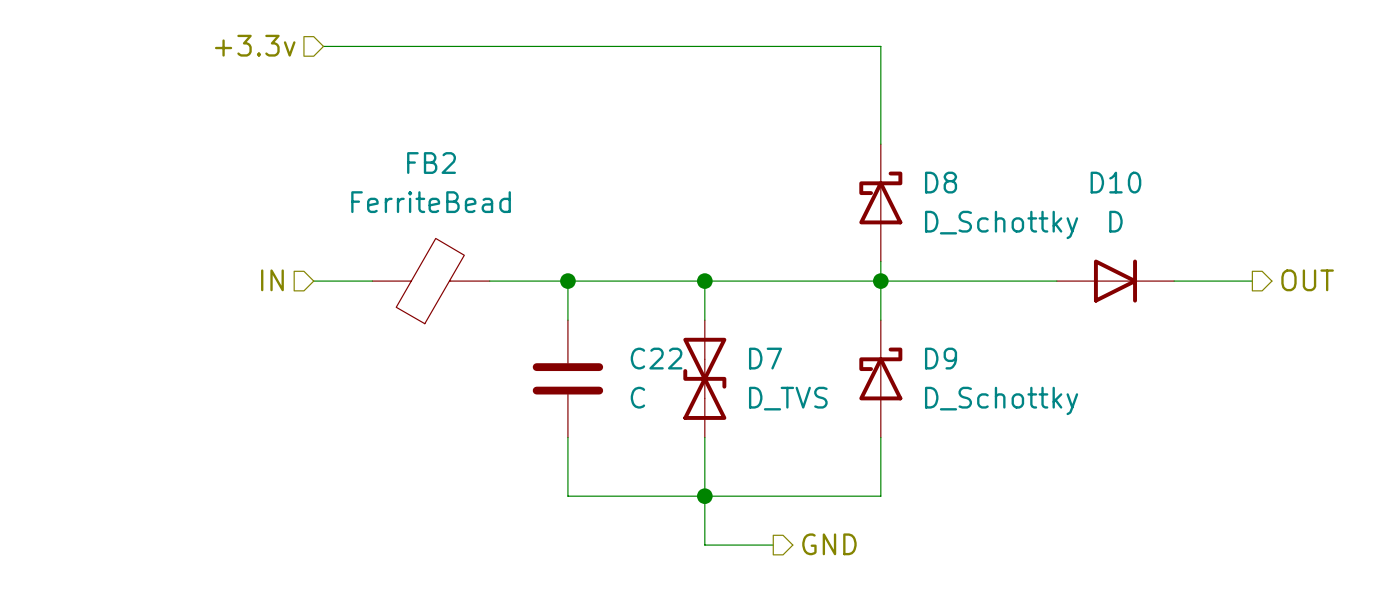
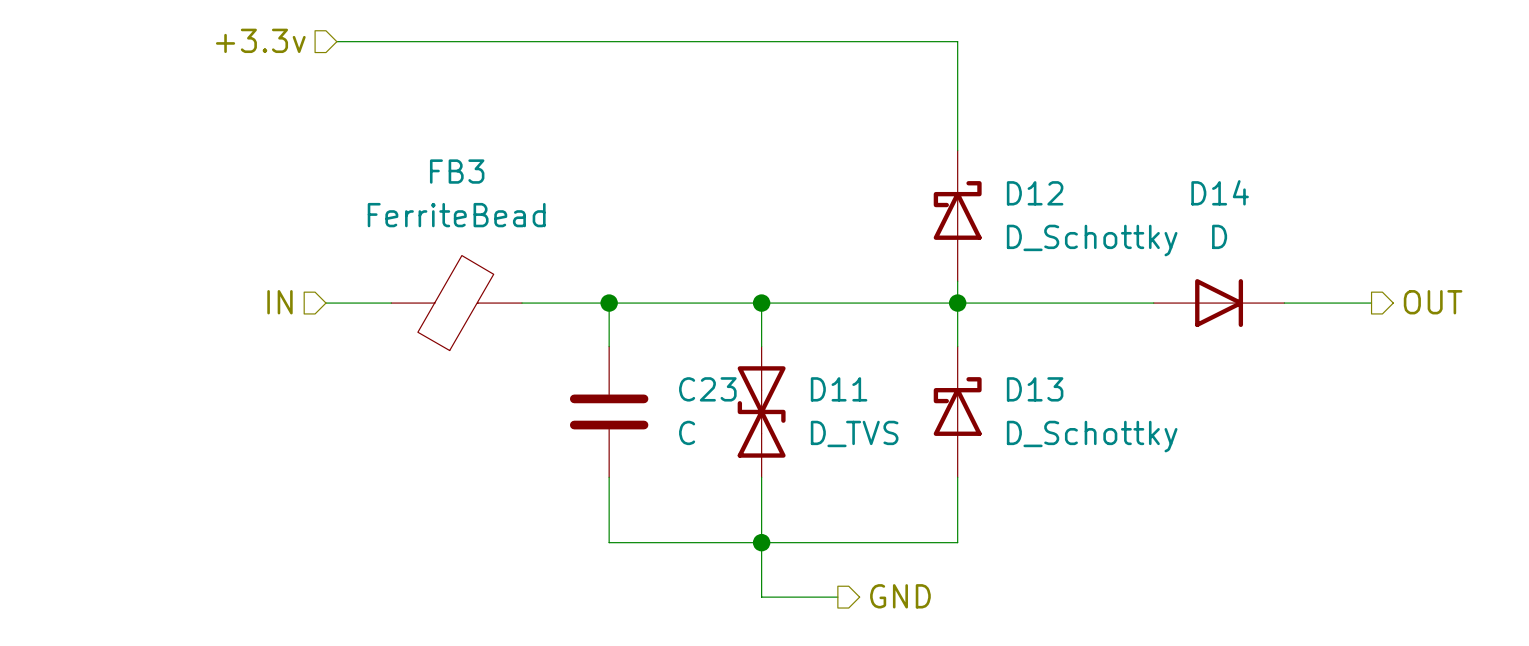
FB2 name: FB2 (431, 163) -> FB3 (457, 171)
D8 name: D8 (941, 182) -> D12 (1035, 193)
D10 name: D10 (1115, 182) -> D14 (1220, 192)
C22 name: C22 (656, 358) -> C23 (707, 389)
D7 name: D7 (765, 358) -> D11 (839, 389)
D9 name: D9 (941, 358) -> D13 (1035, 389)

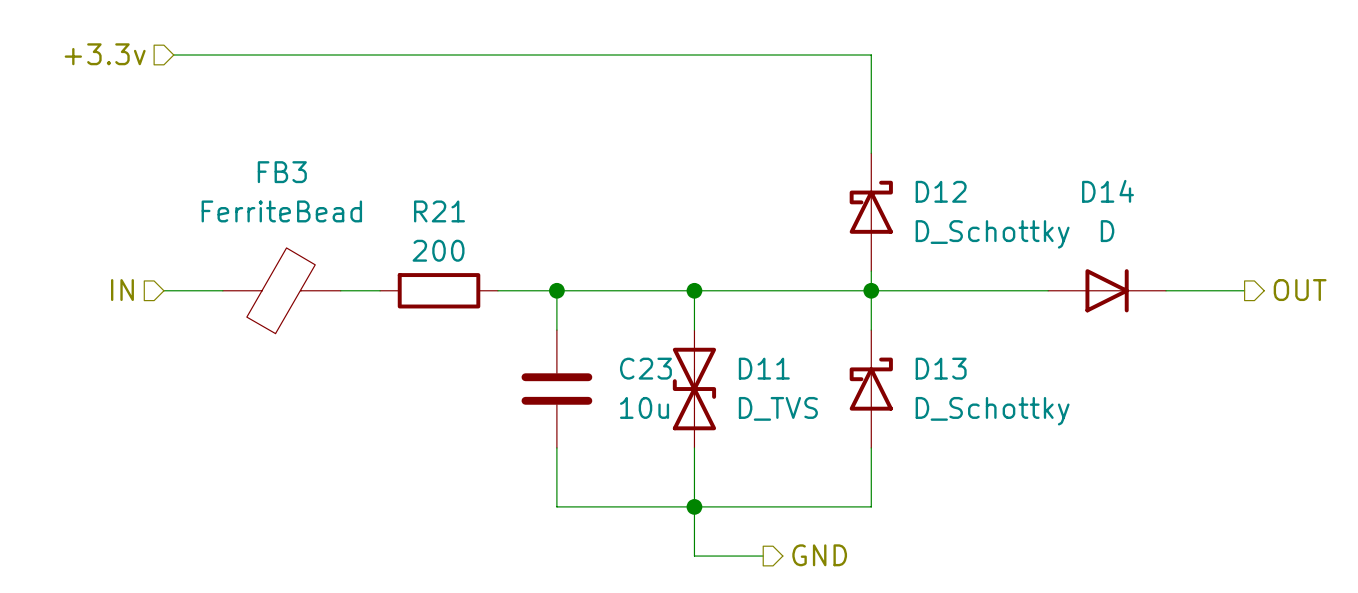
hierarchical label position: +3.3v (260, 40) -> +3.3v (105, 54)
wire: none -> (173, 54) (311, 54)
hierarchical label position: IN (279, 302) -> IN (122, 290)
wire: none -> (163, 290) (222, 290)
FB3 position: (456, 303) -> (281, 290)
R21: none -> 200 (439, 290)
C23 value: C (687, 432) -> 10u (644, 407)

